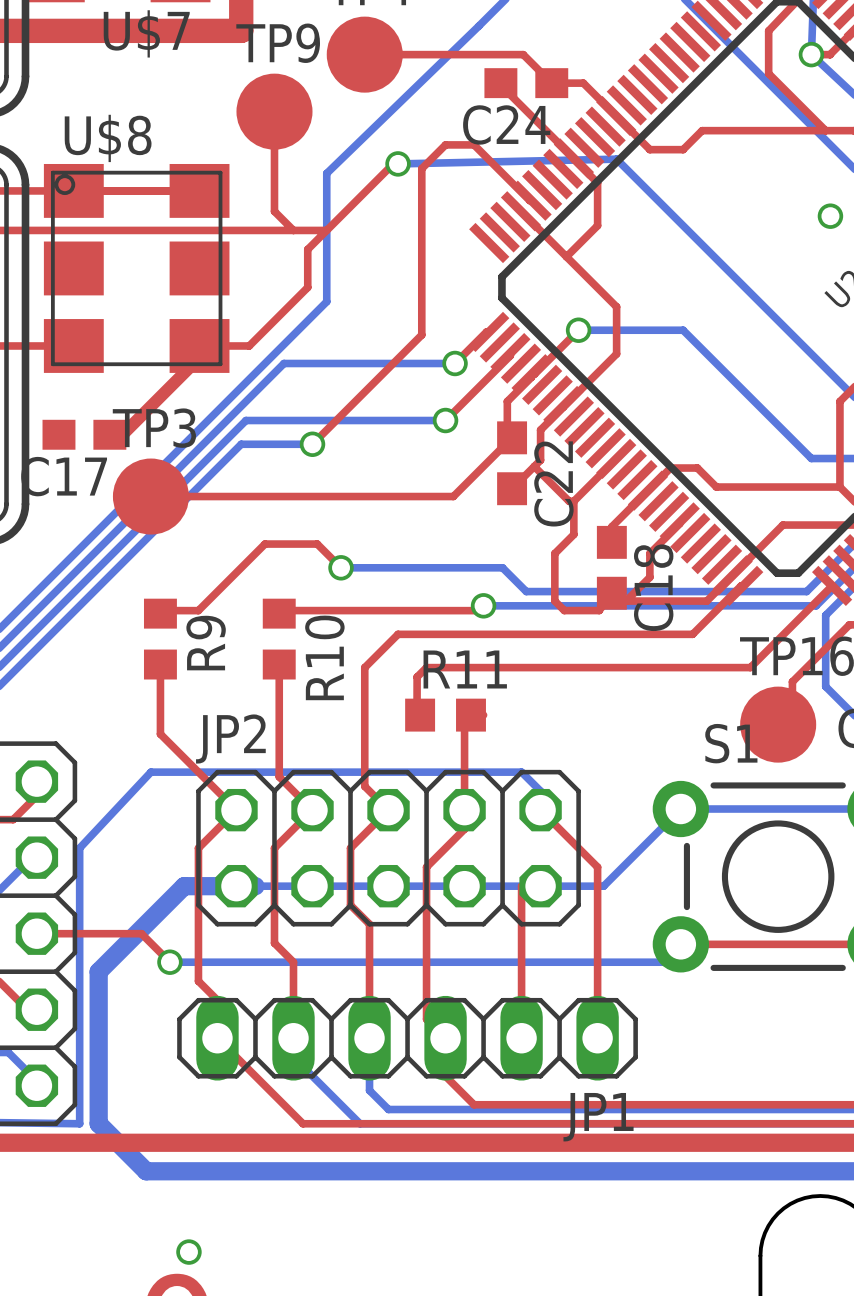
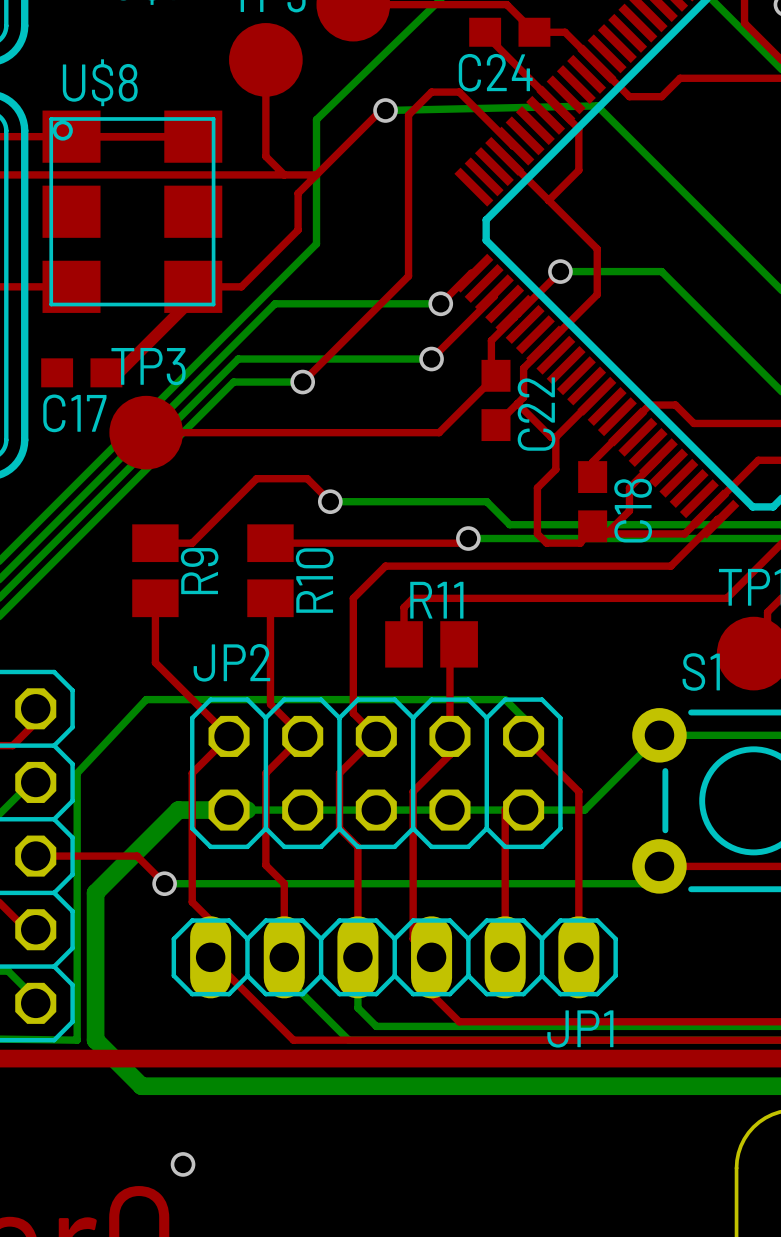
R9 footprint: [143, 598, 177, 680] -> [132, 524, 179, 618]
R10 footprint: [262, 598, 296, 680] -> [247, 524, 294, 618]
R11 footprint: [405, 698, 486, 732] -> [385, 621, 478, 668]

